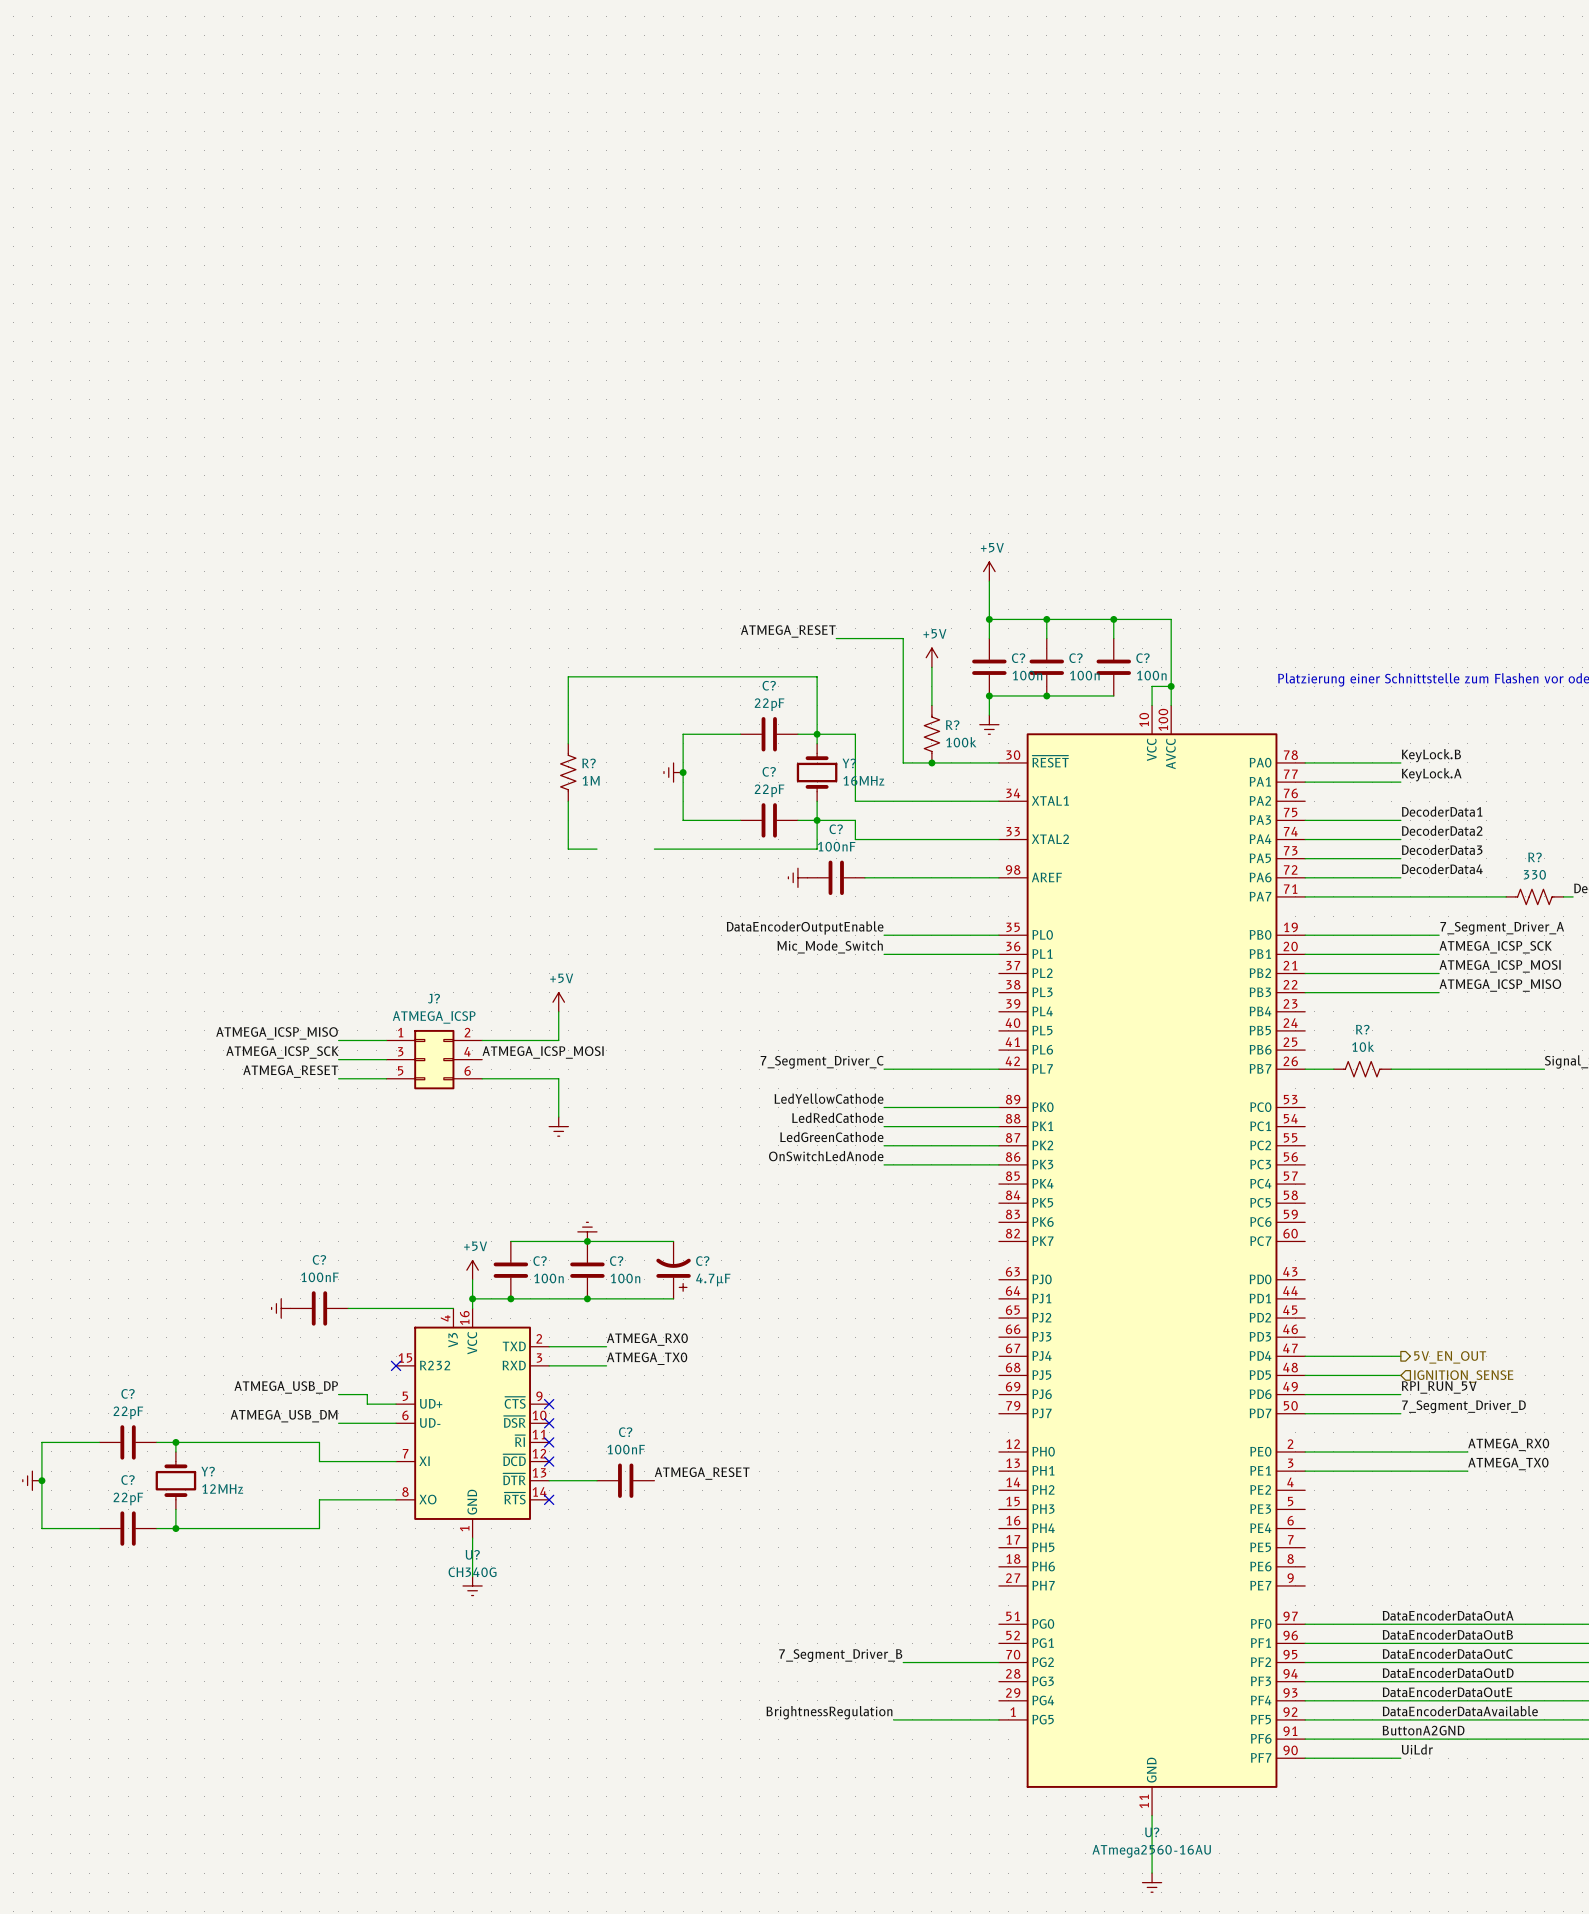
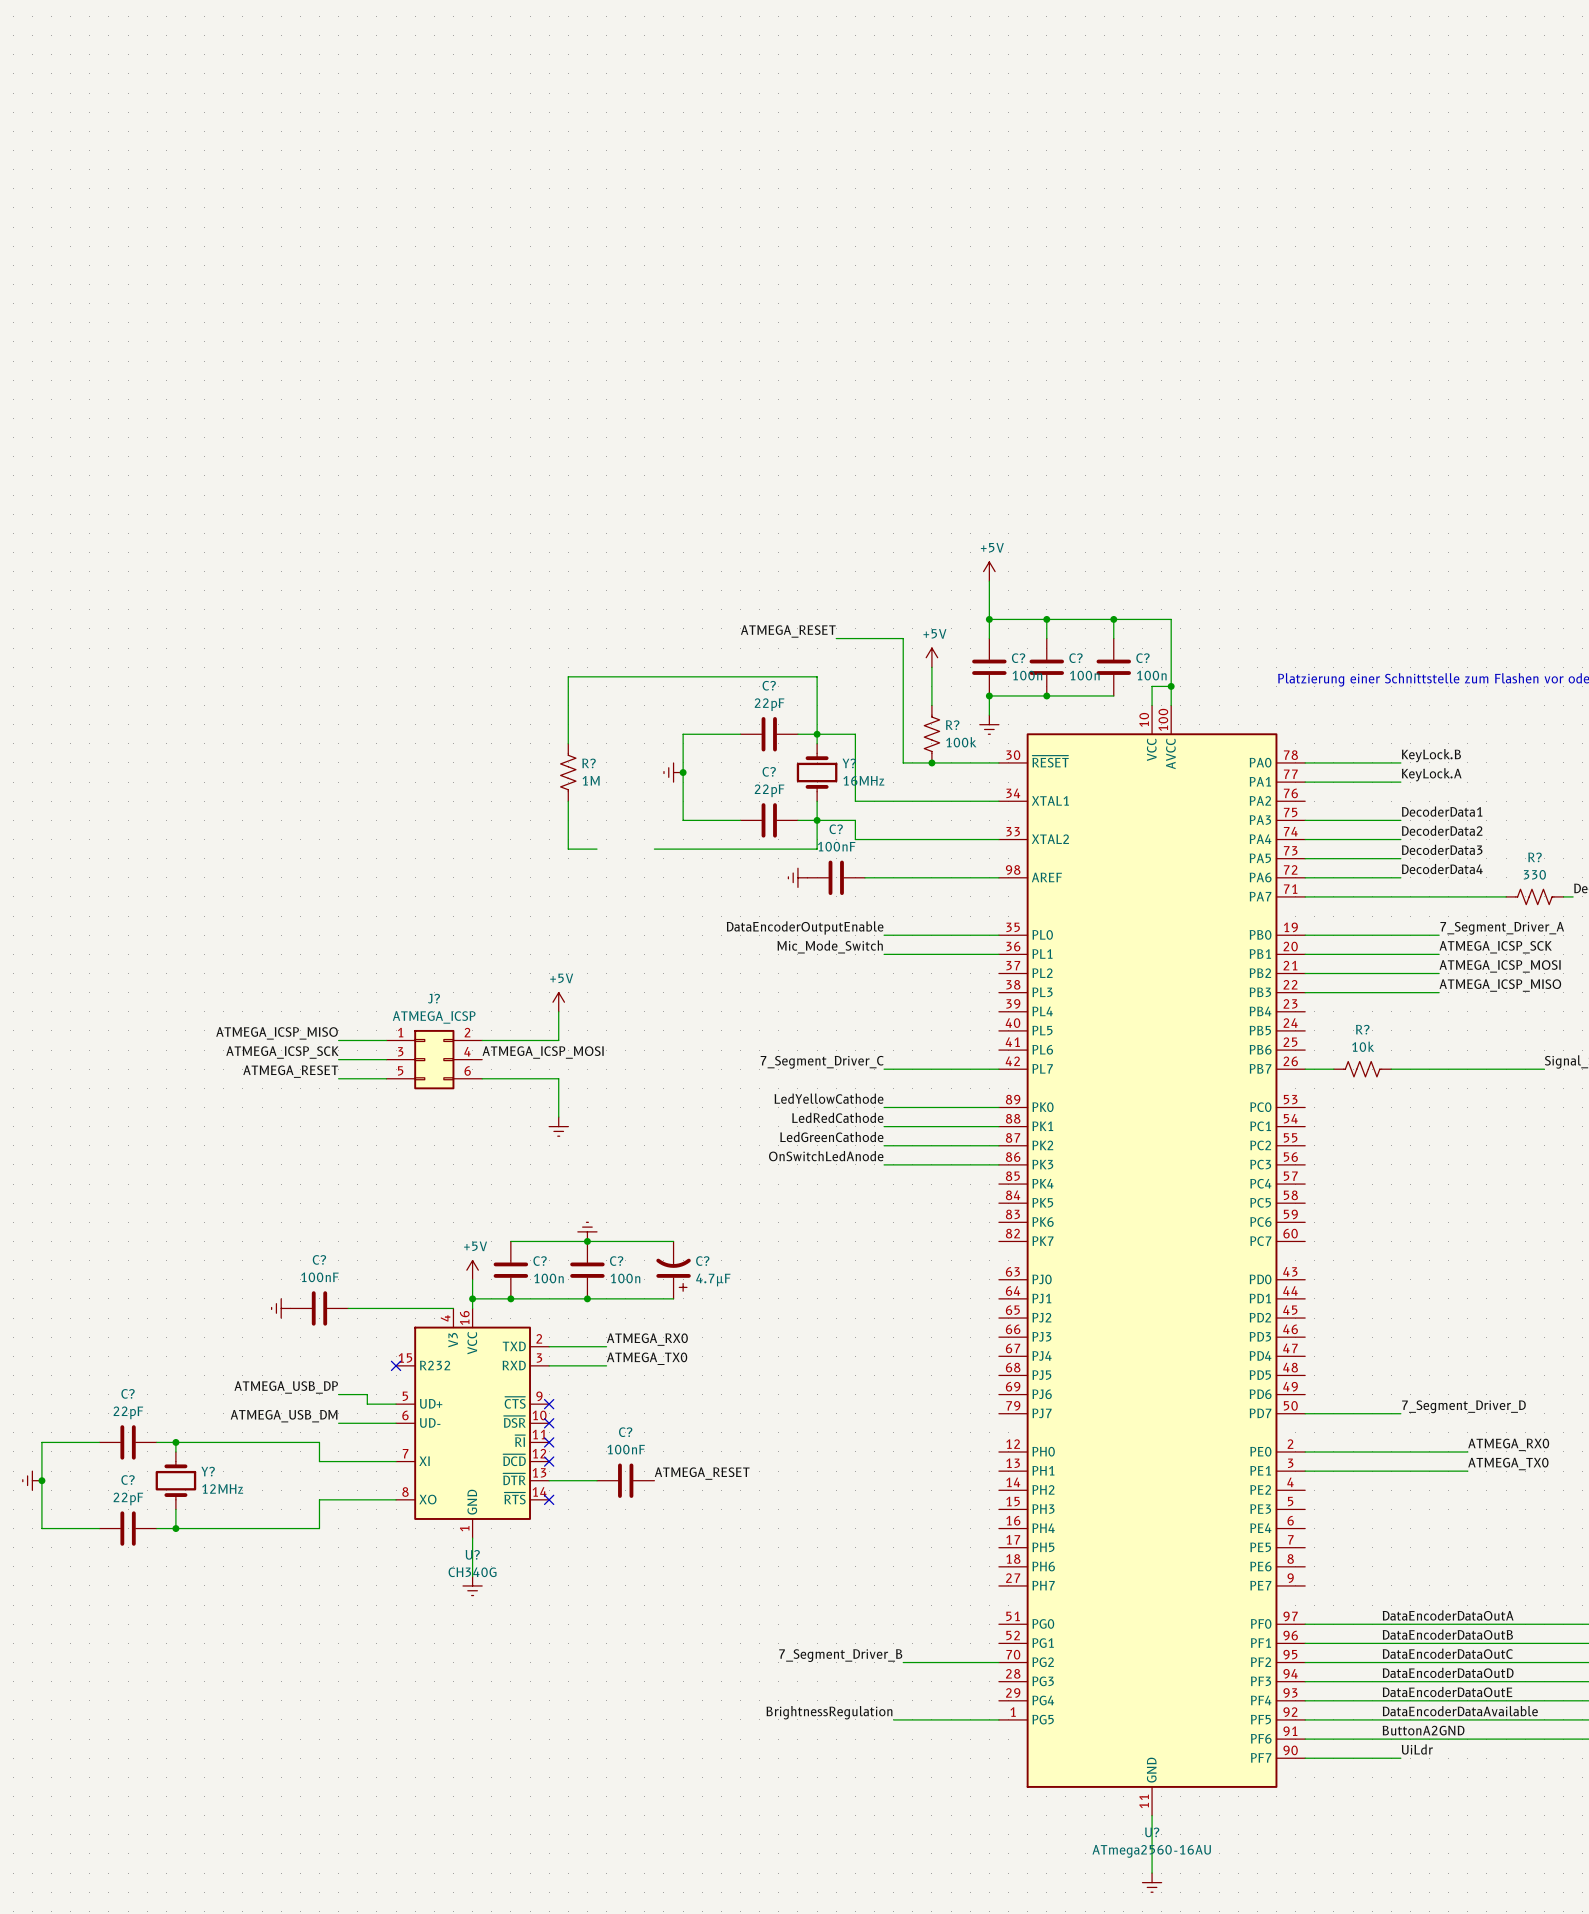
wire: (1305, 1356) (1400, 1356) -> none
hierarchical label: 5V_EN_OUT (1450, 1357) -> none
wire: (1305, 1375) (1400, 1375) -> none
hierarchical label: IGNITION_SENSE (1463, 1376) -> none
label: RPI_RUN_5V (1439, 1387) -> none
wire: (1305, 1394) (1400, 1394) -> none

